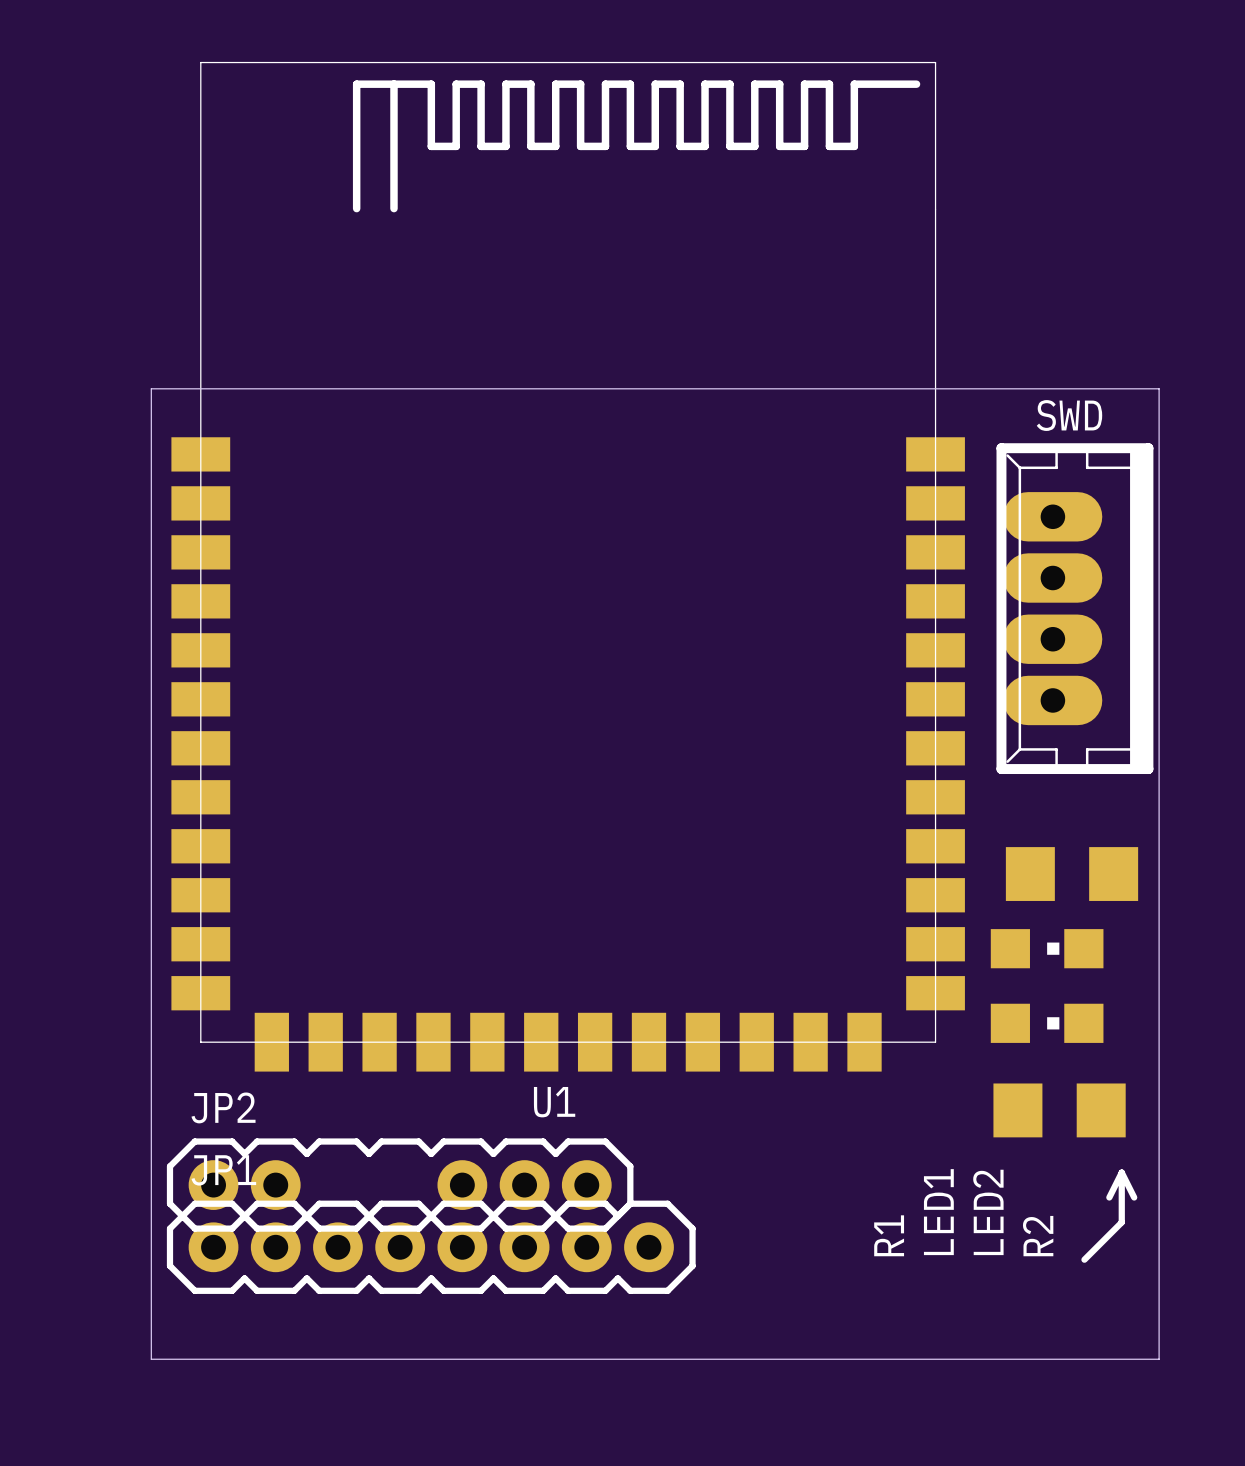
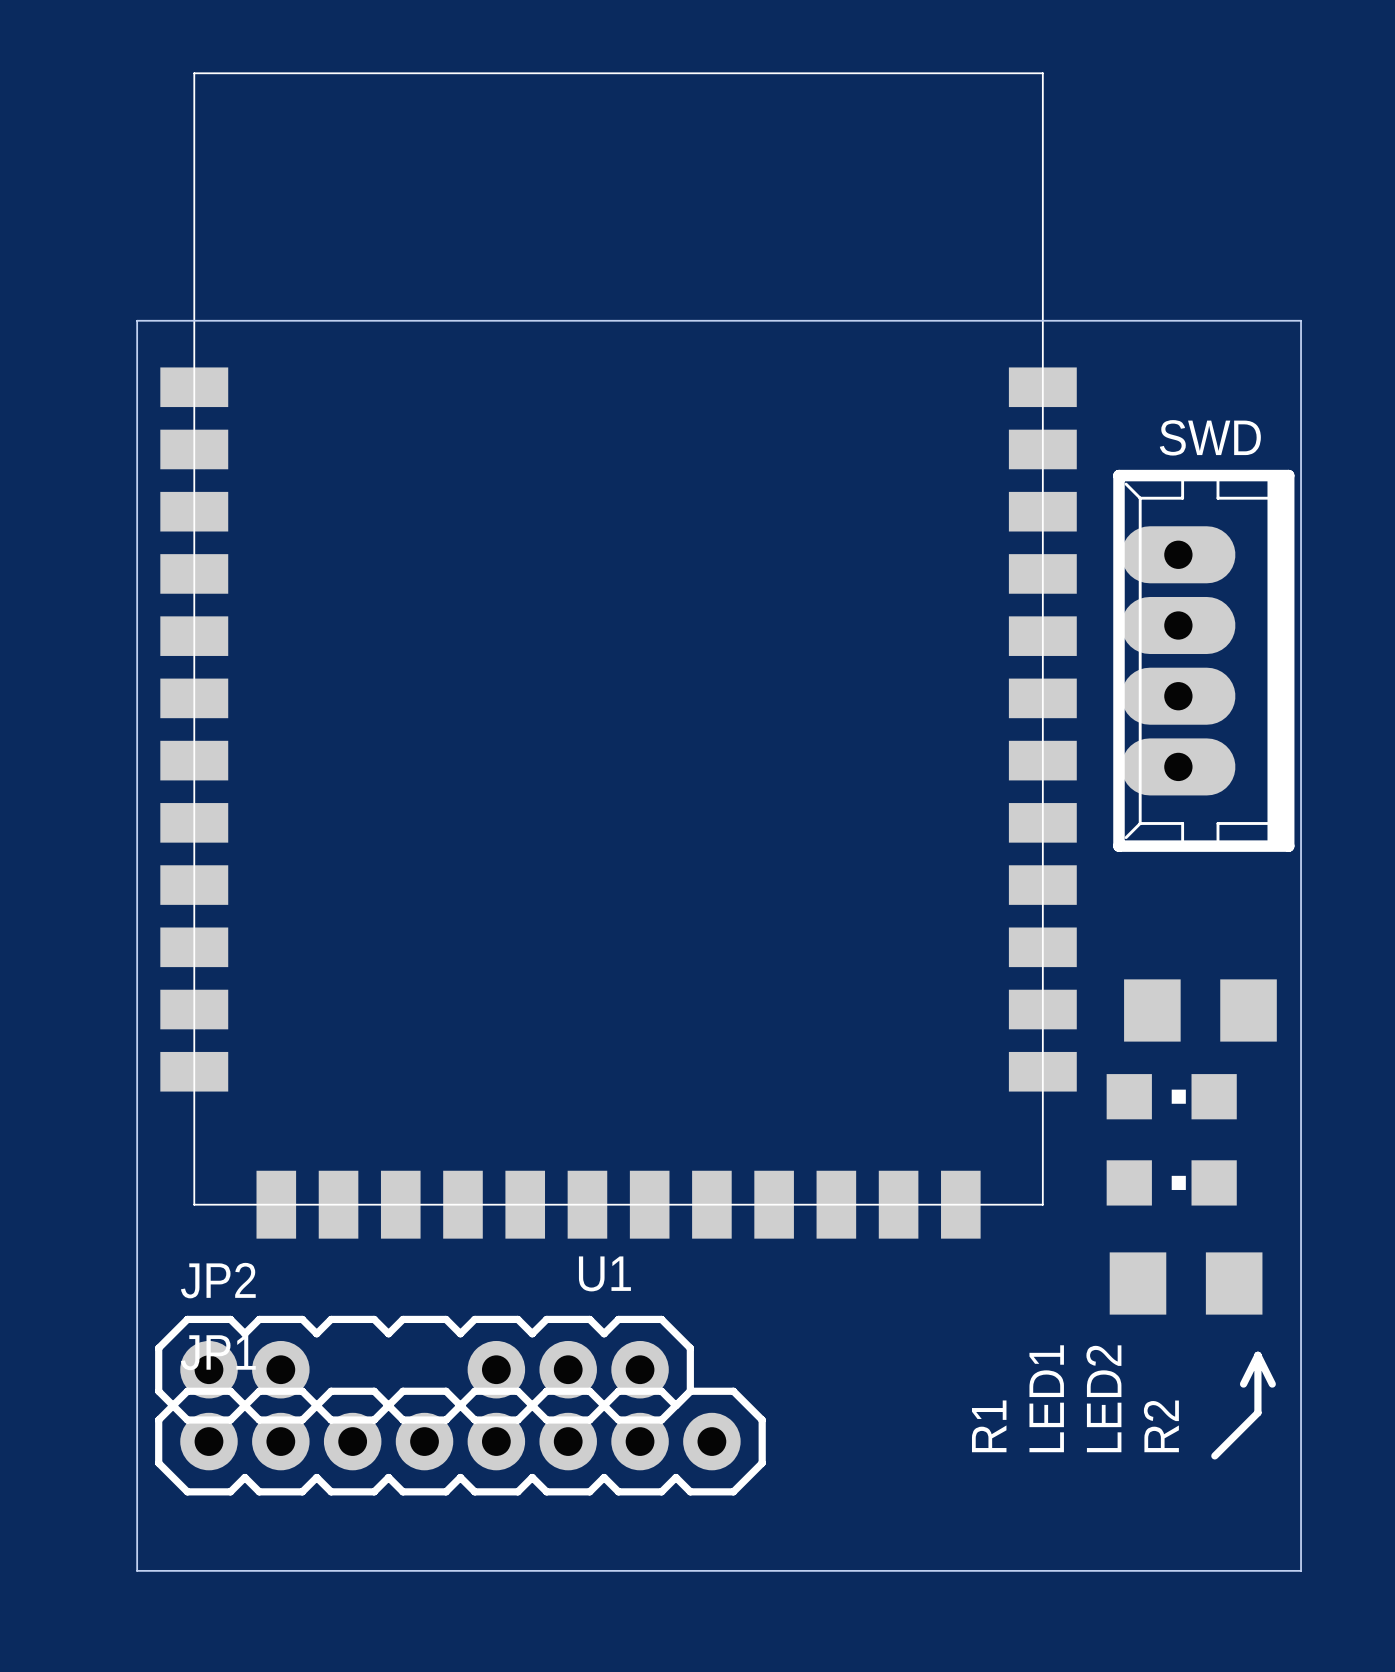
U1 footprint: [171, 62, 965, 1072] -> [160, 73, 1077, 1239]
board edge: (151, 388) (1159, 388) -> (137, 450) (137, 320) (1301, 320) (1301, 450)
SWD position: (1074, 608) -> (1203, 660)

